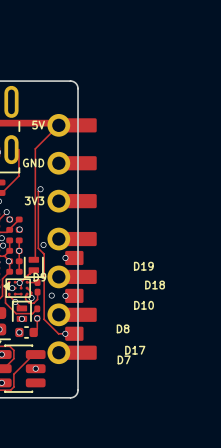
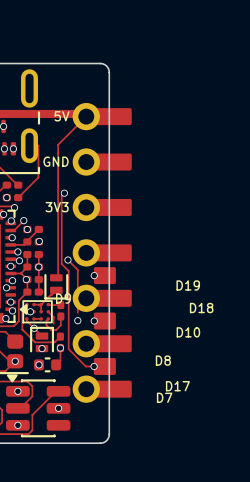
track: none -> (67, 260) (77, 269) (77, 312)
via: (19, 282) -> none
via: (31, 298) -> none

